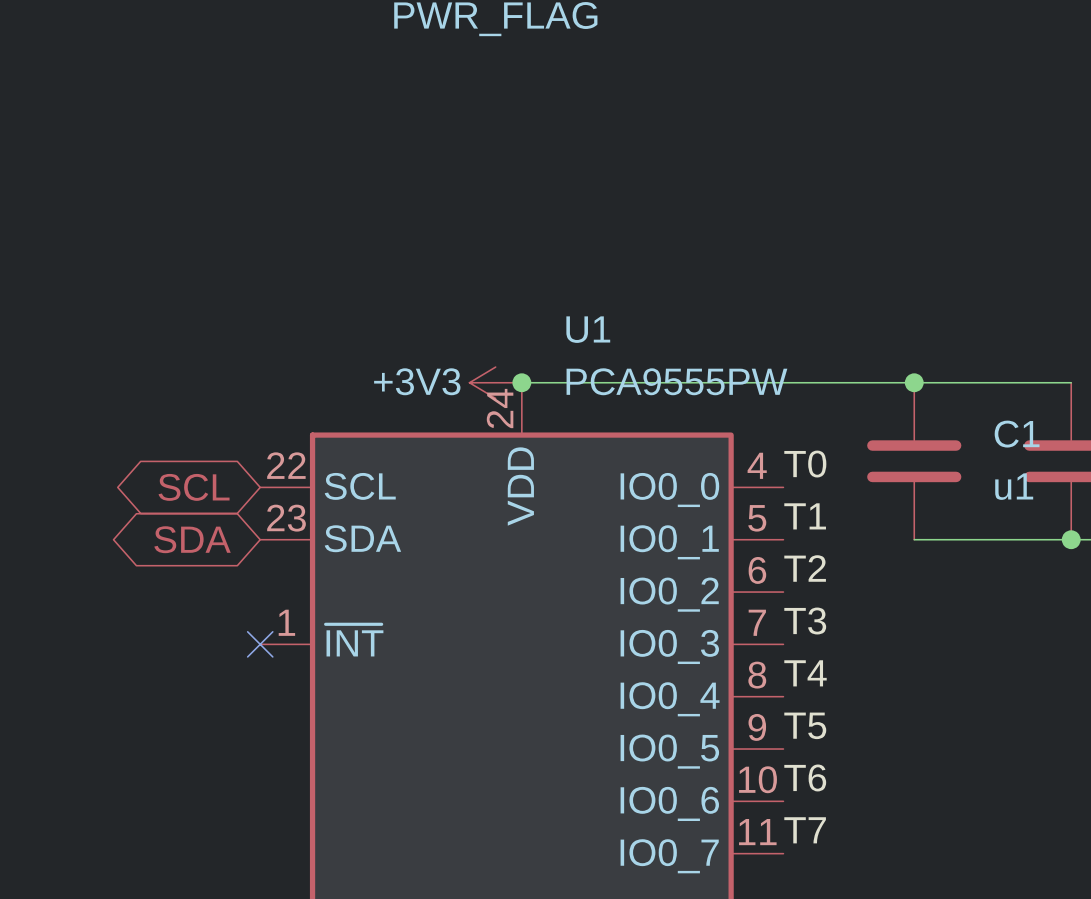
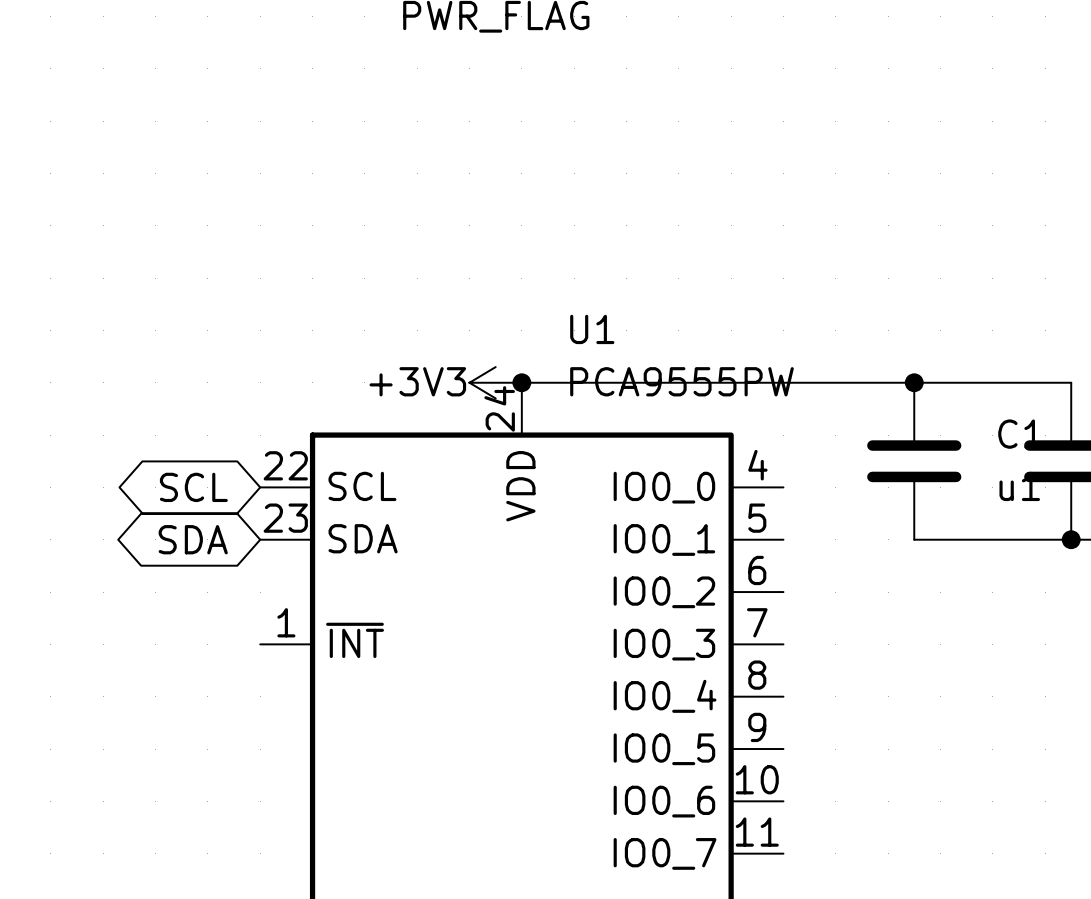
label: T0 (805, 464) -> none
label: T1 (805, 516) -> none
label: T2 (805, 568) -> none
label: T3 (805, 621) -> none
no-connect mark: (260, 644) -> none
label: T4 (805, 673) -> none
label: T5 (805, 725) -> none
label: T6 (805, 777) -> none
label: T7 (805, 830) -> none

